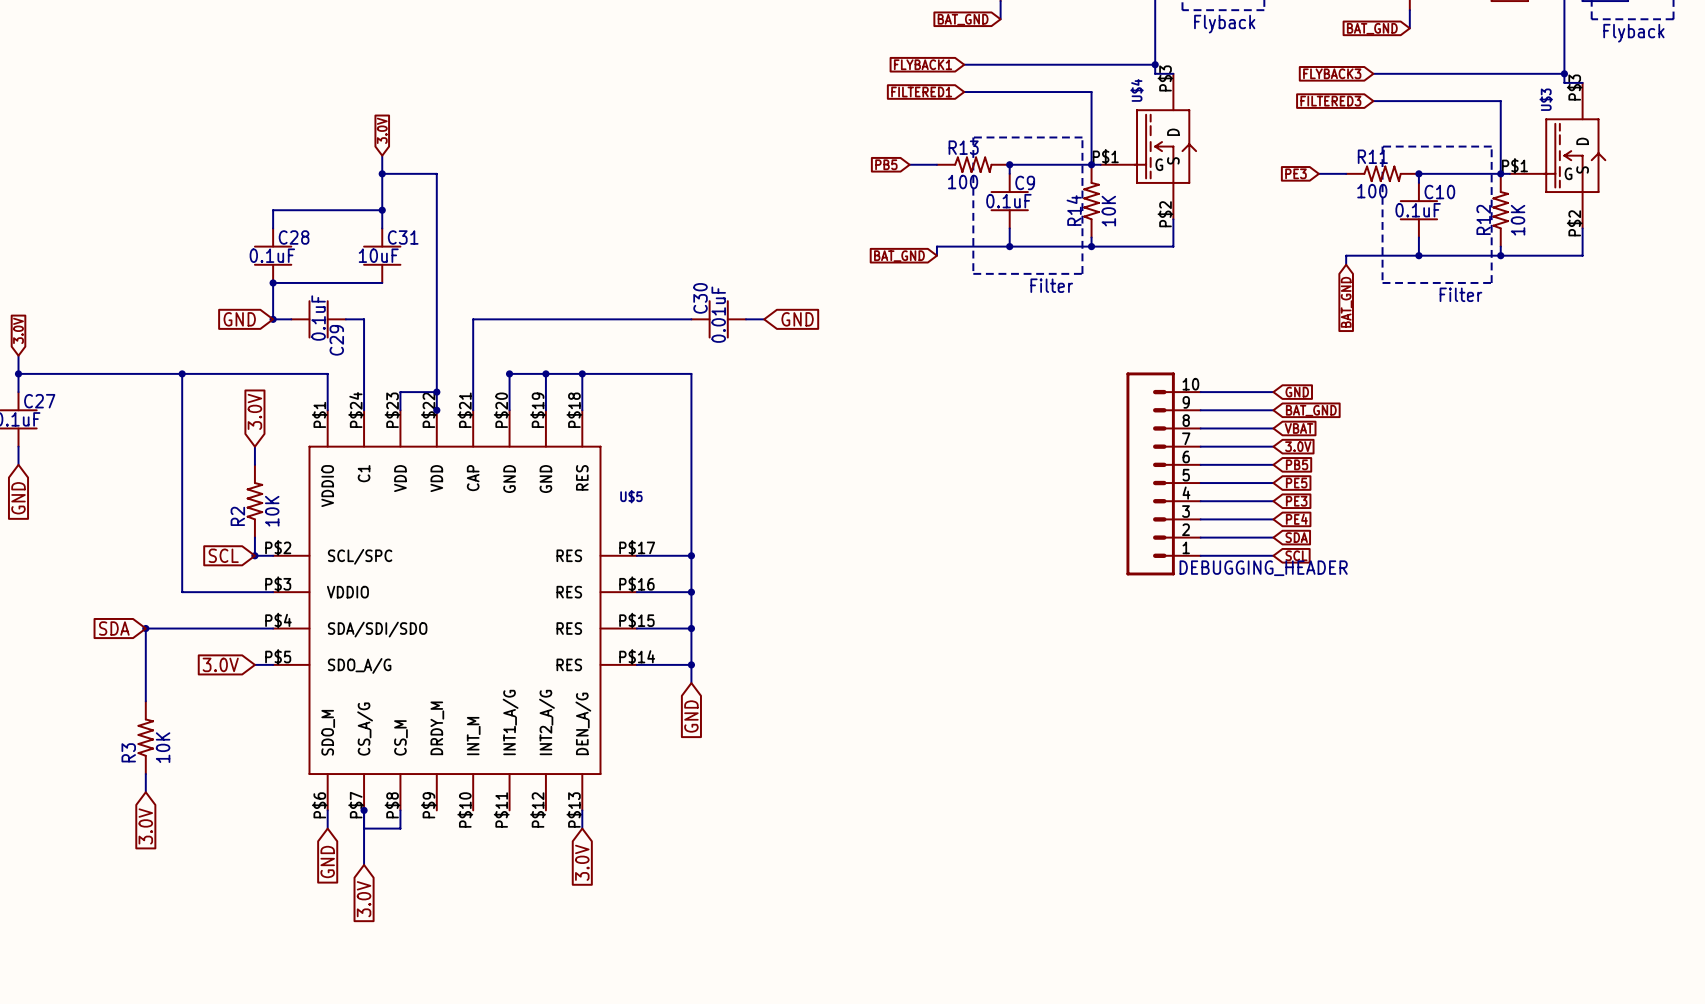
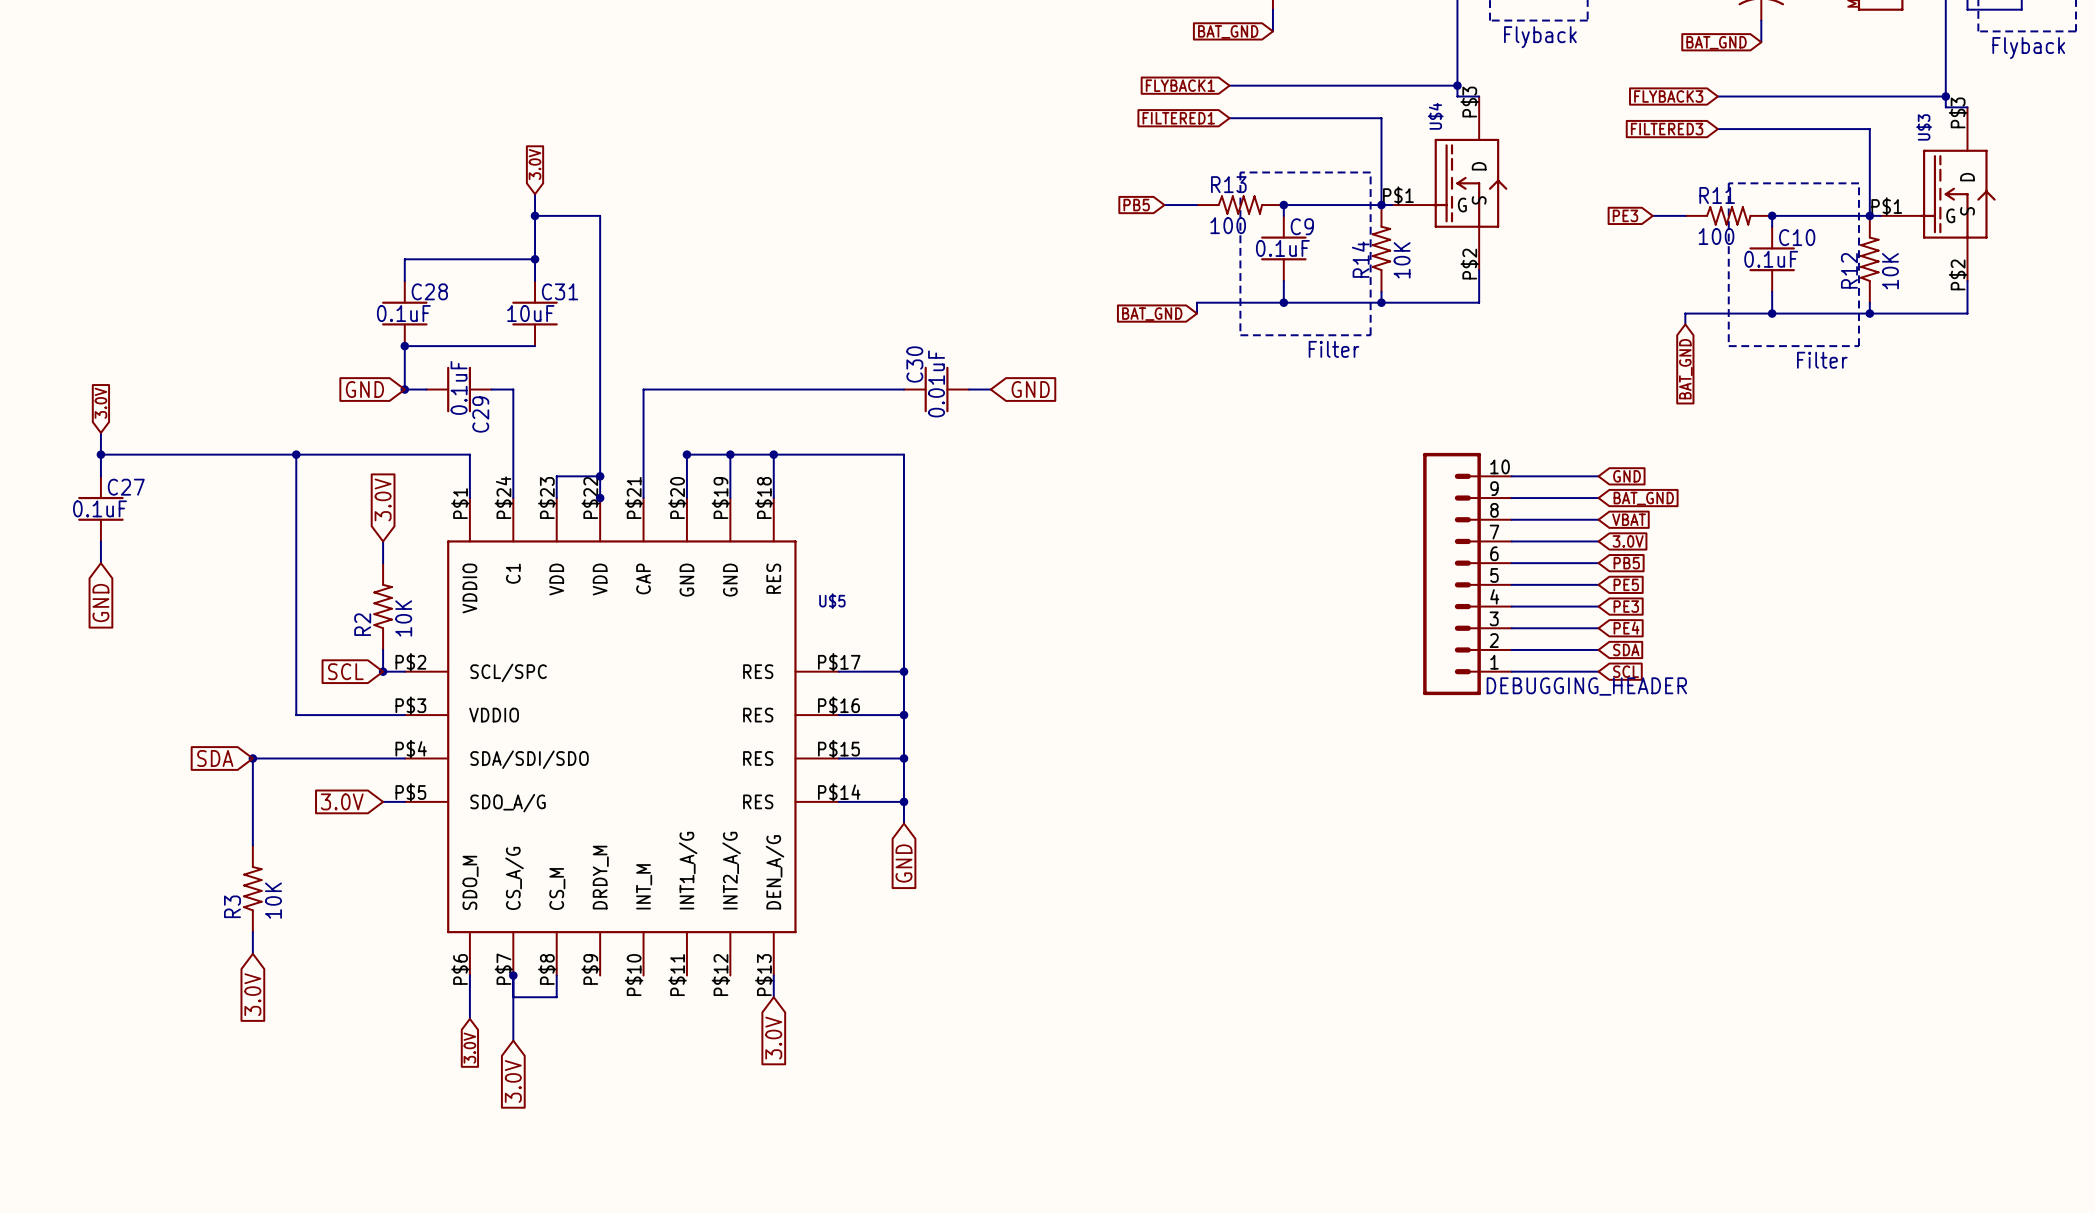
wire: none -> (469, 997) (469, 1018)
global label: GND (327, 862) -> none
global label: none -> 3.0V (469, 1048)

